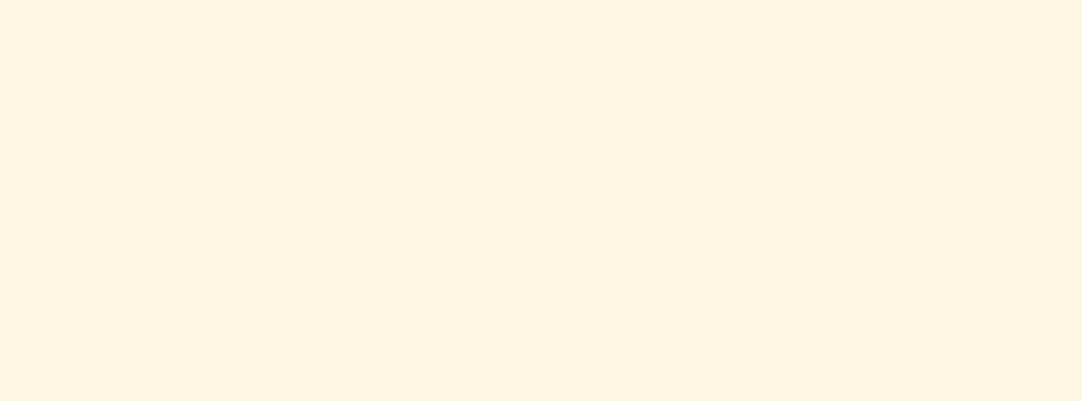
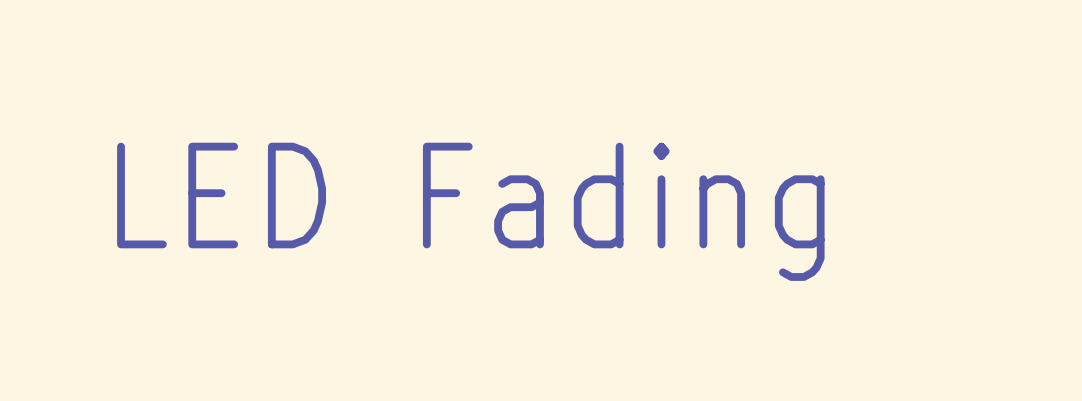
text: none -> LED Fading (470, 211)

